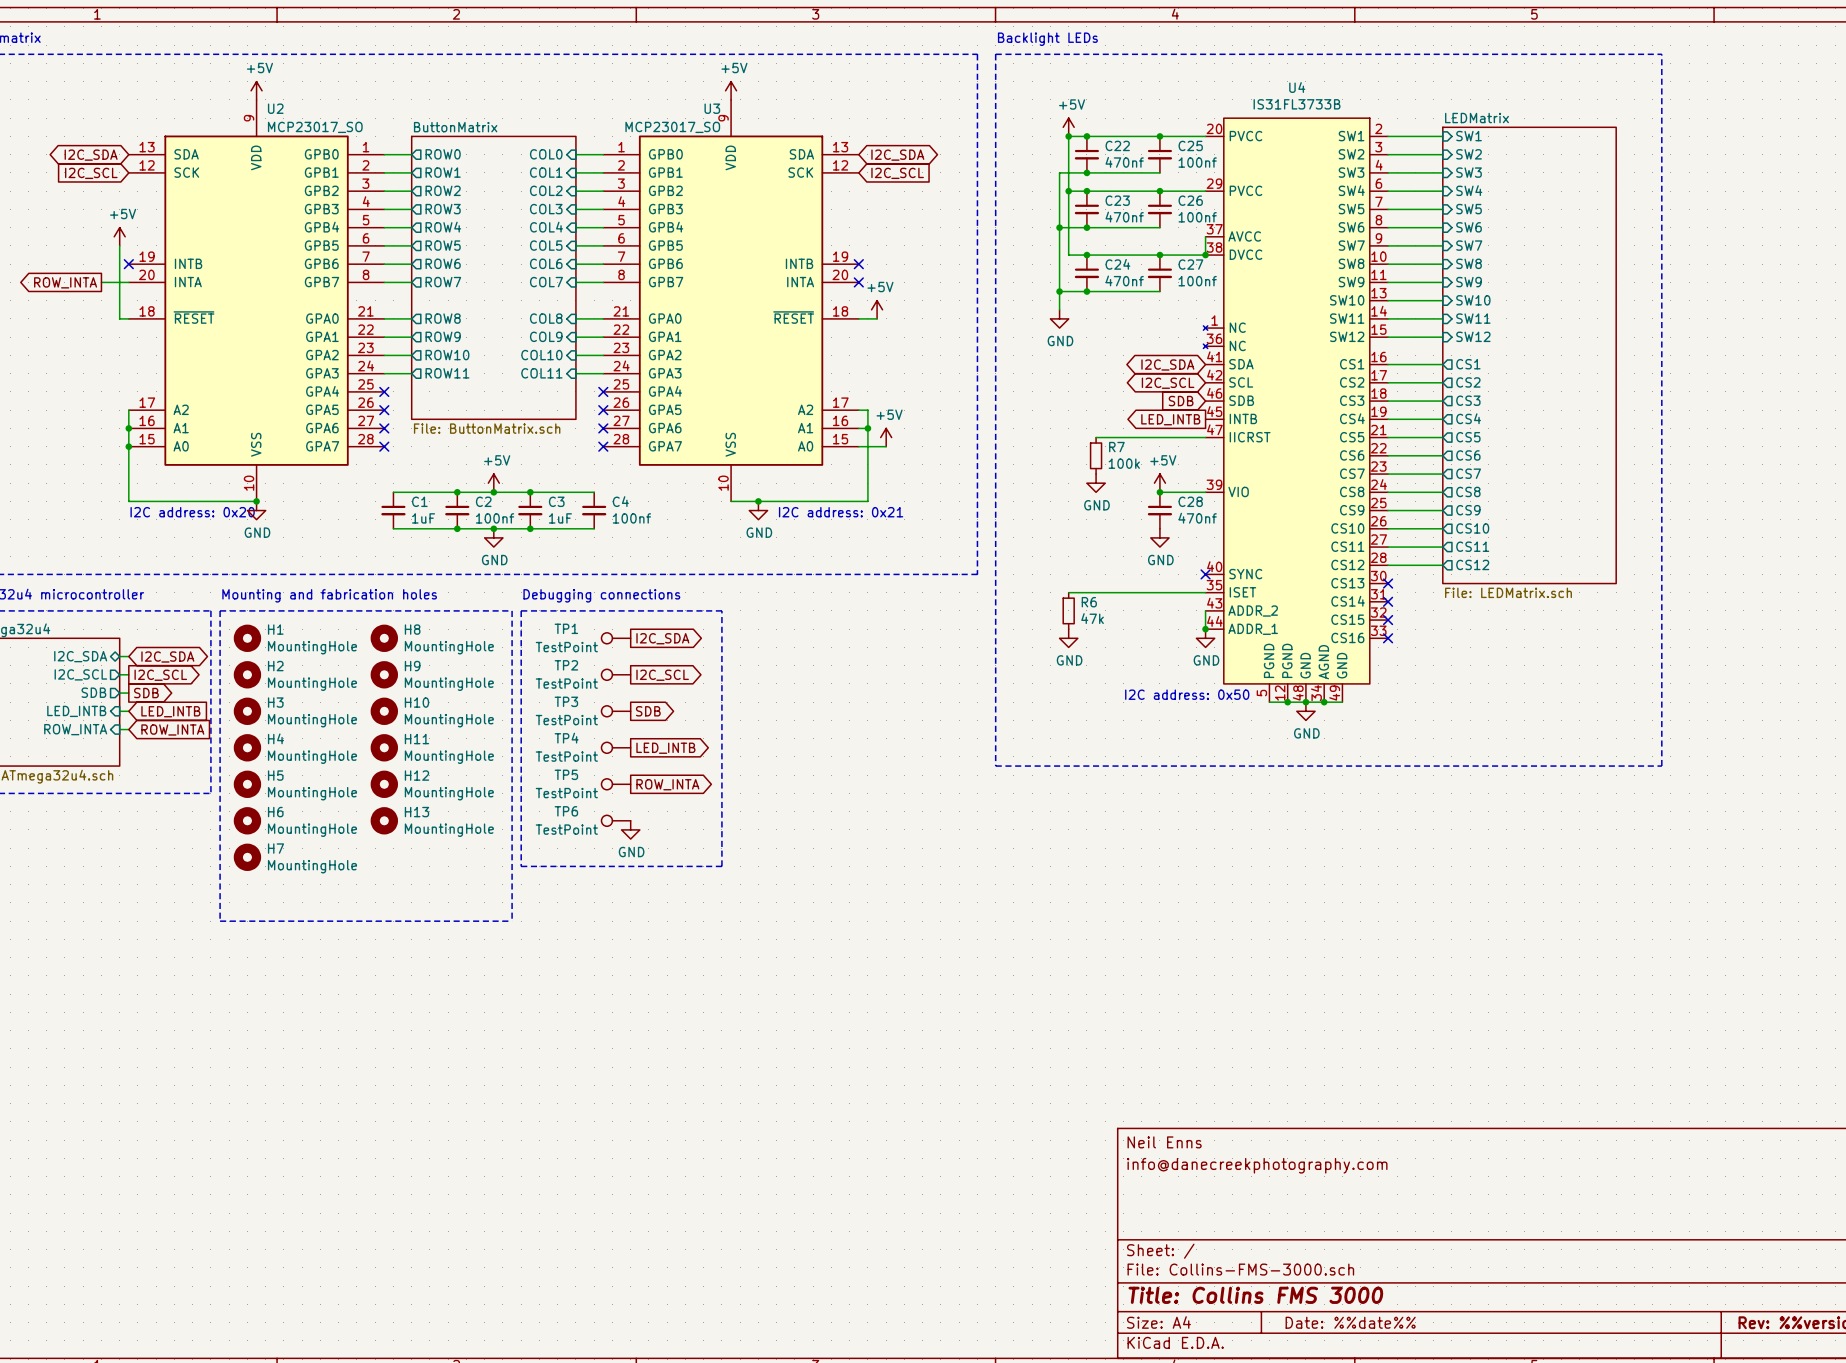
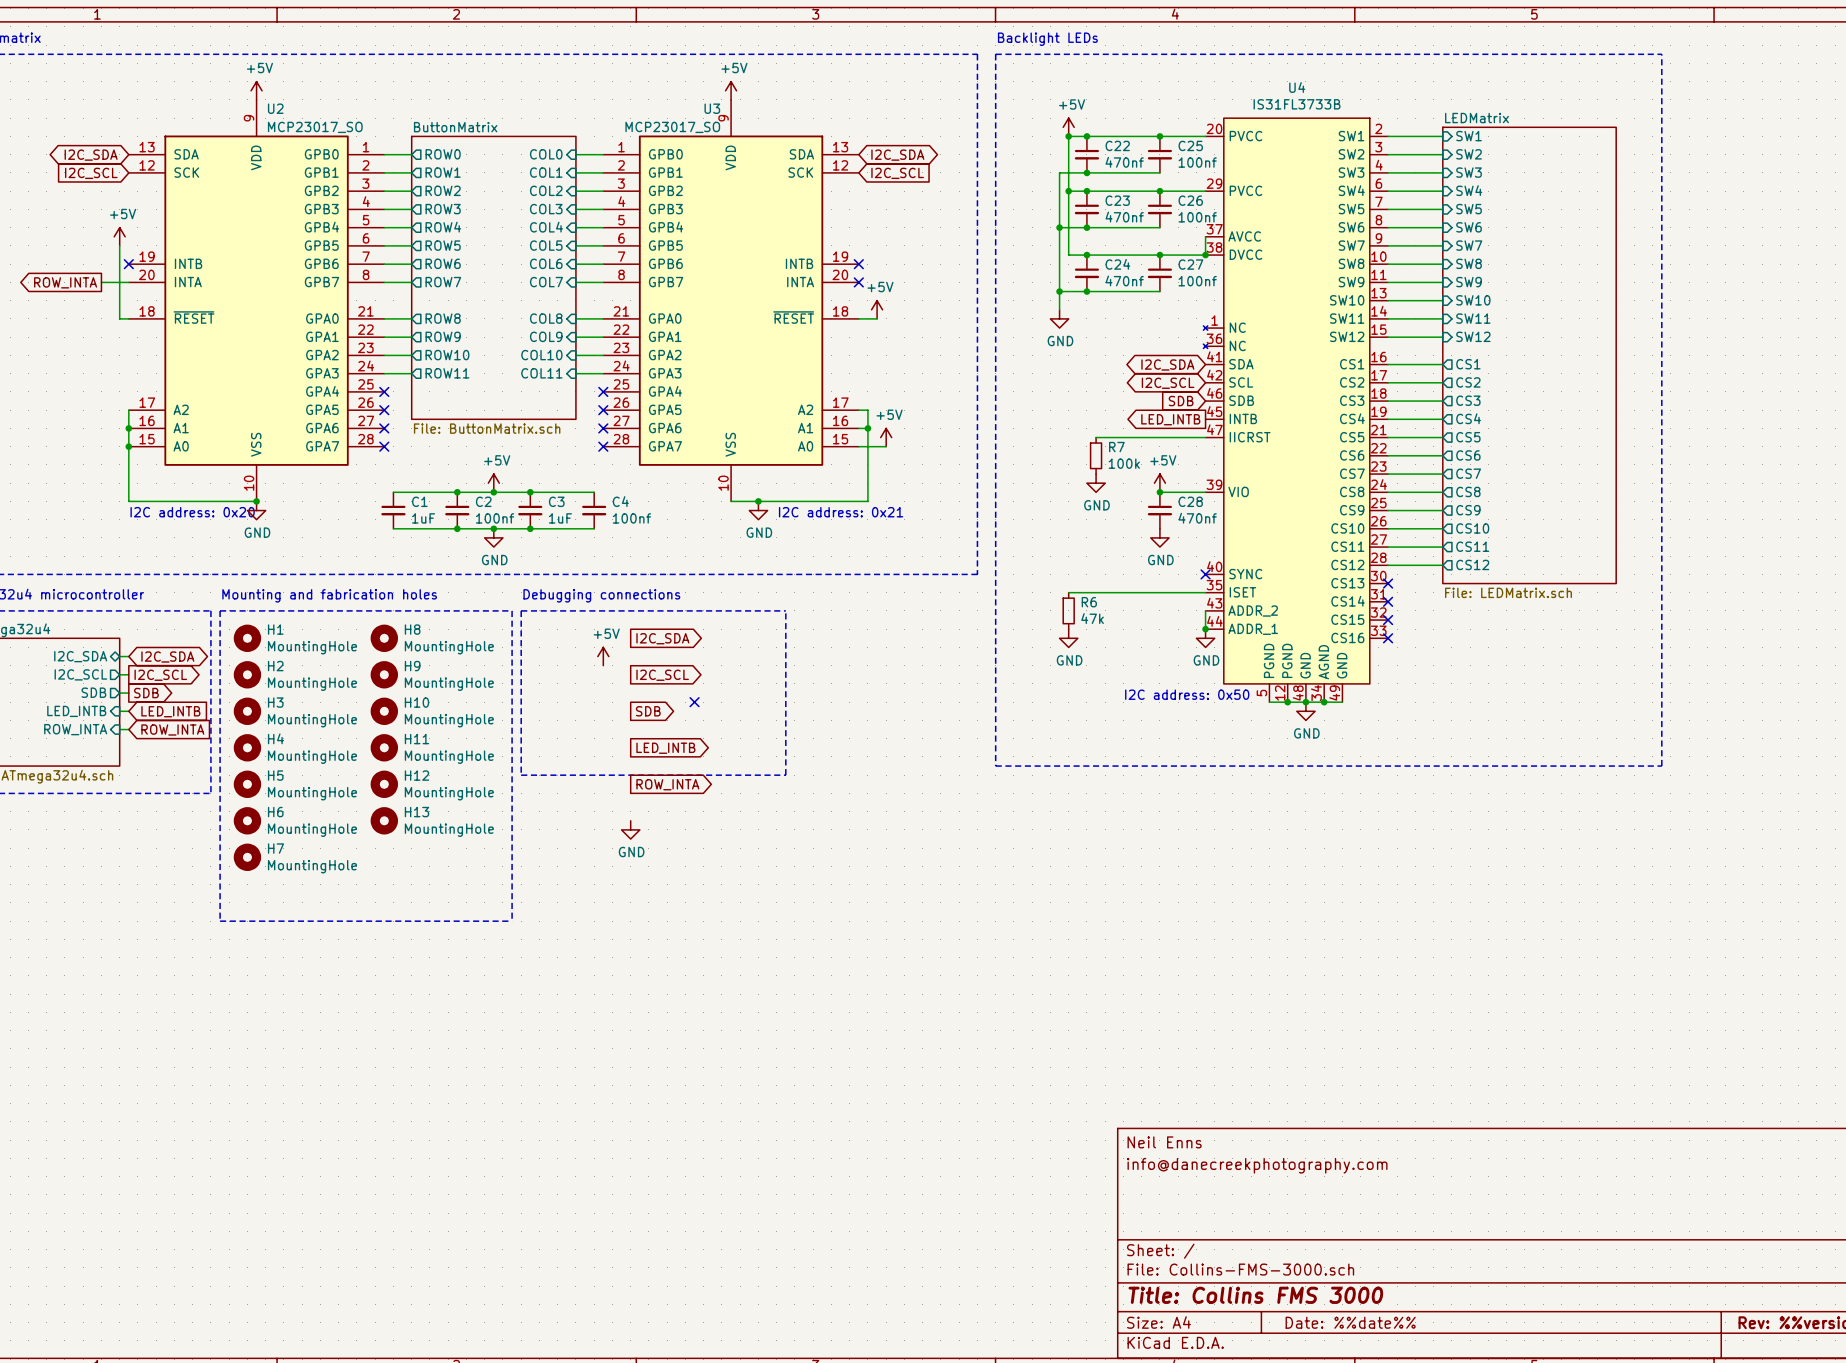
line: (721, 610) (721, 866) (521, 866) (521, 775) -> (721, 610) (785, 610) (785, 775) (521, 775)
TP1: TestPoint (616, 638) -> none
power symbol: none -> +5V (603, 656)
TP2: TestPoint (616, 674) -> none
no-connect mark: none -> (694, 702)
TP3: TestPoint (616, 711) -> none
TP4: TestPoint (616, 747) -> none
TP5: TestPoint (616, 784) -> none
TP6: TestPoint (616, 820) -> none

